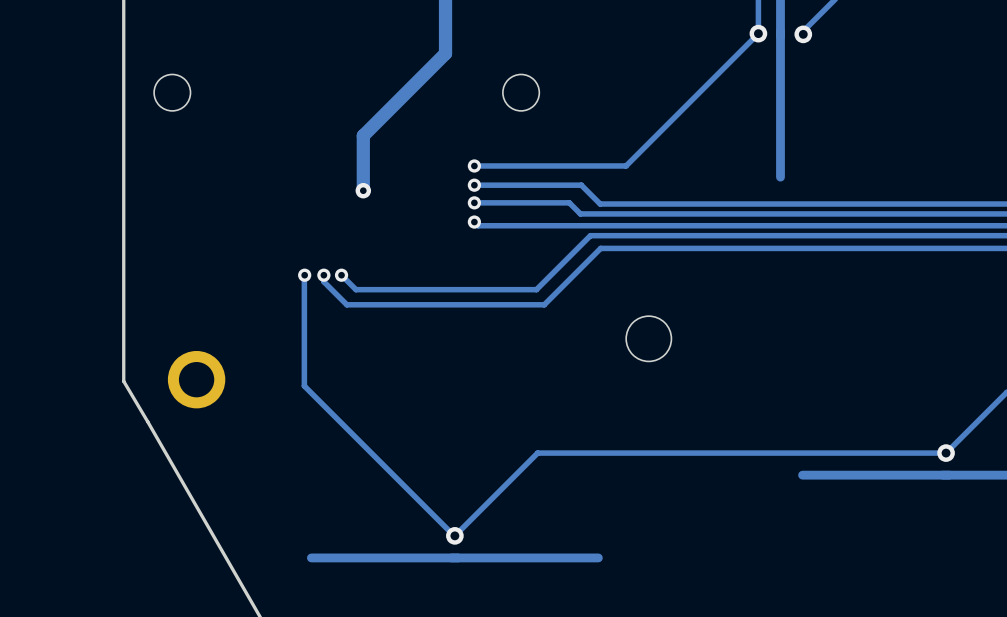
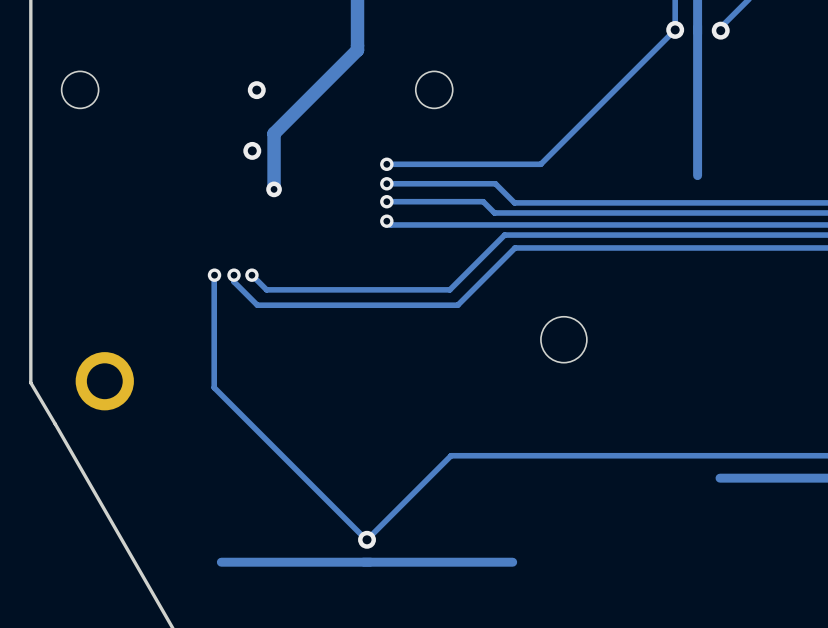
via: none -> (256, 90)
via: none -> (252, 150)

